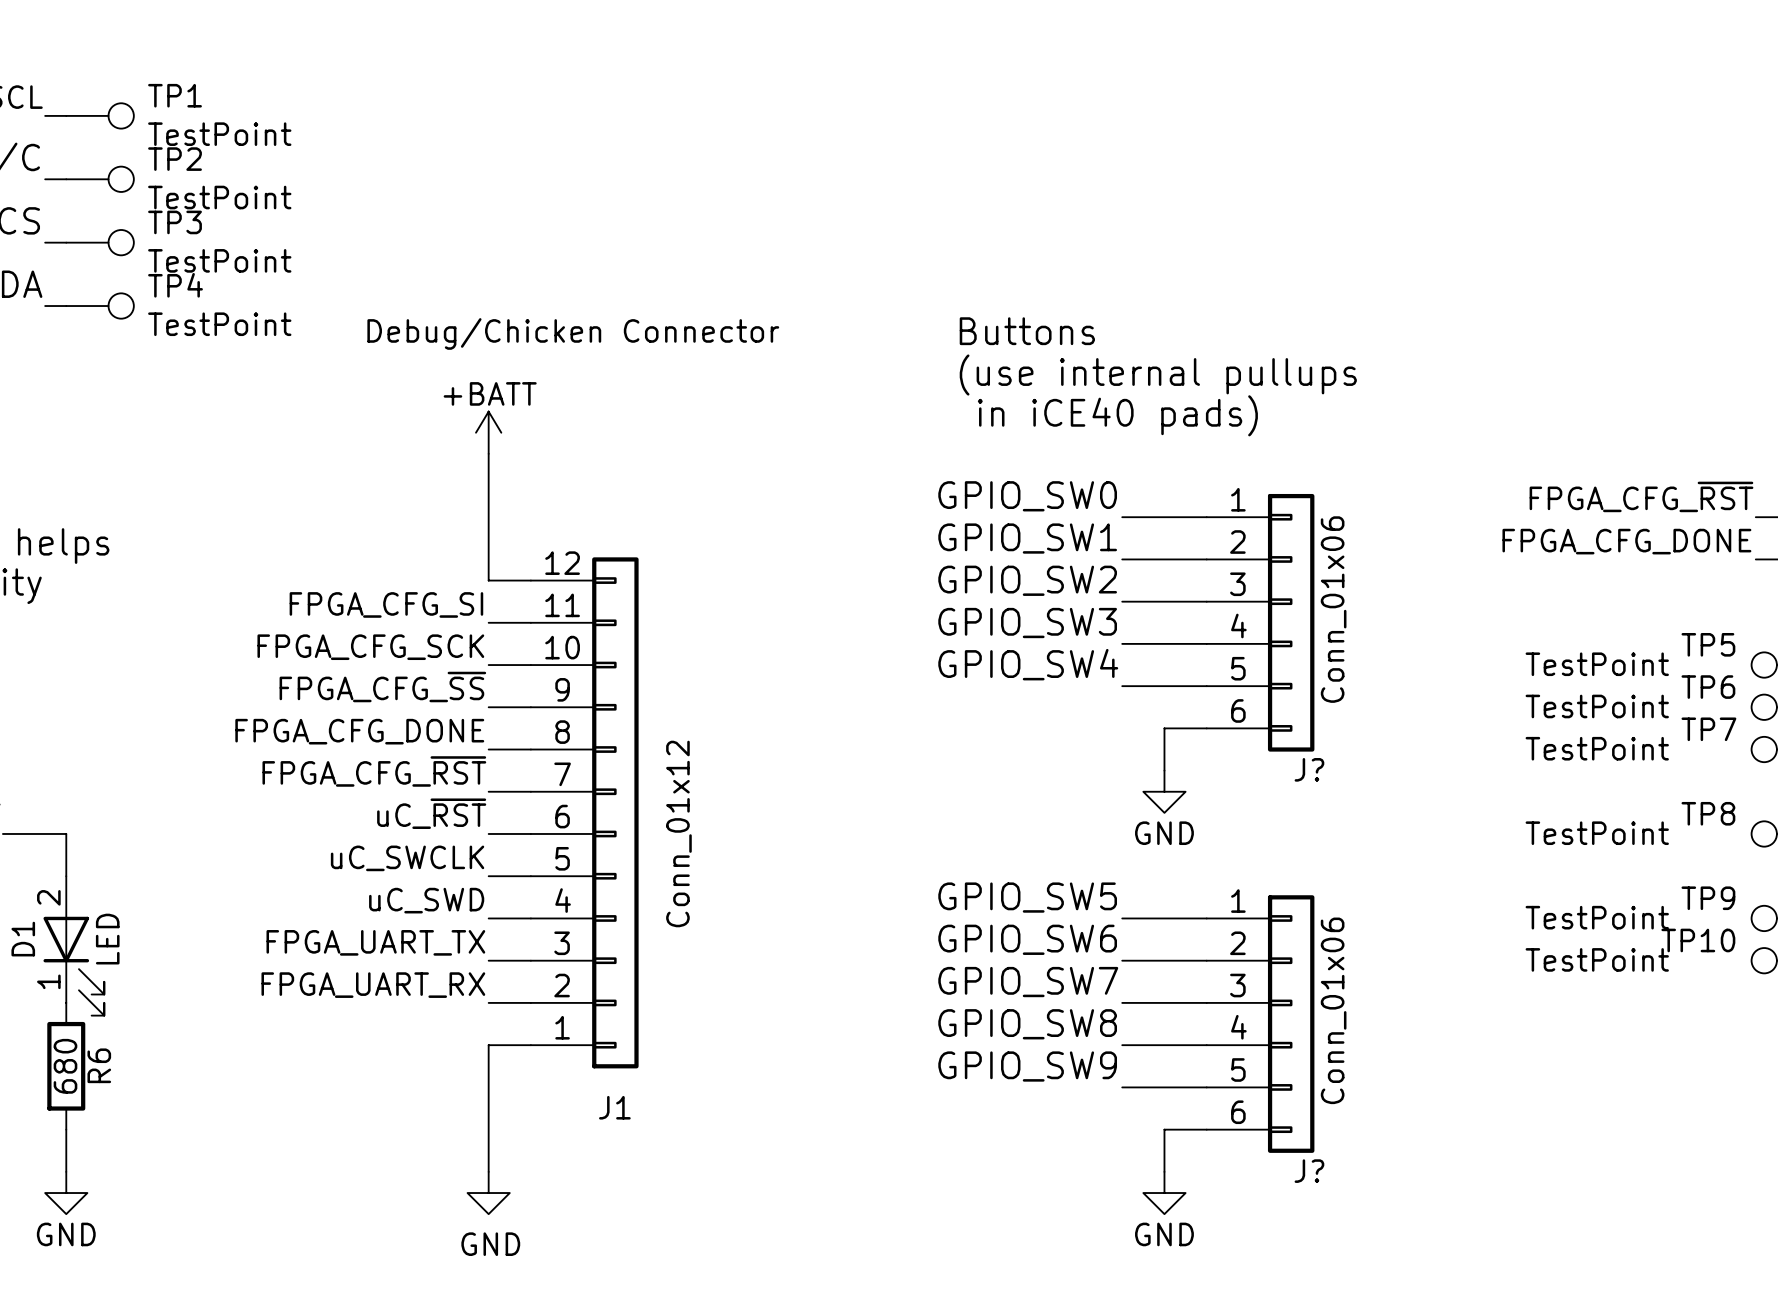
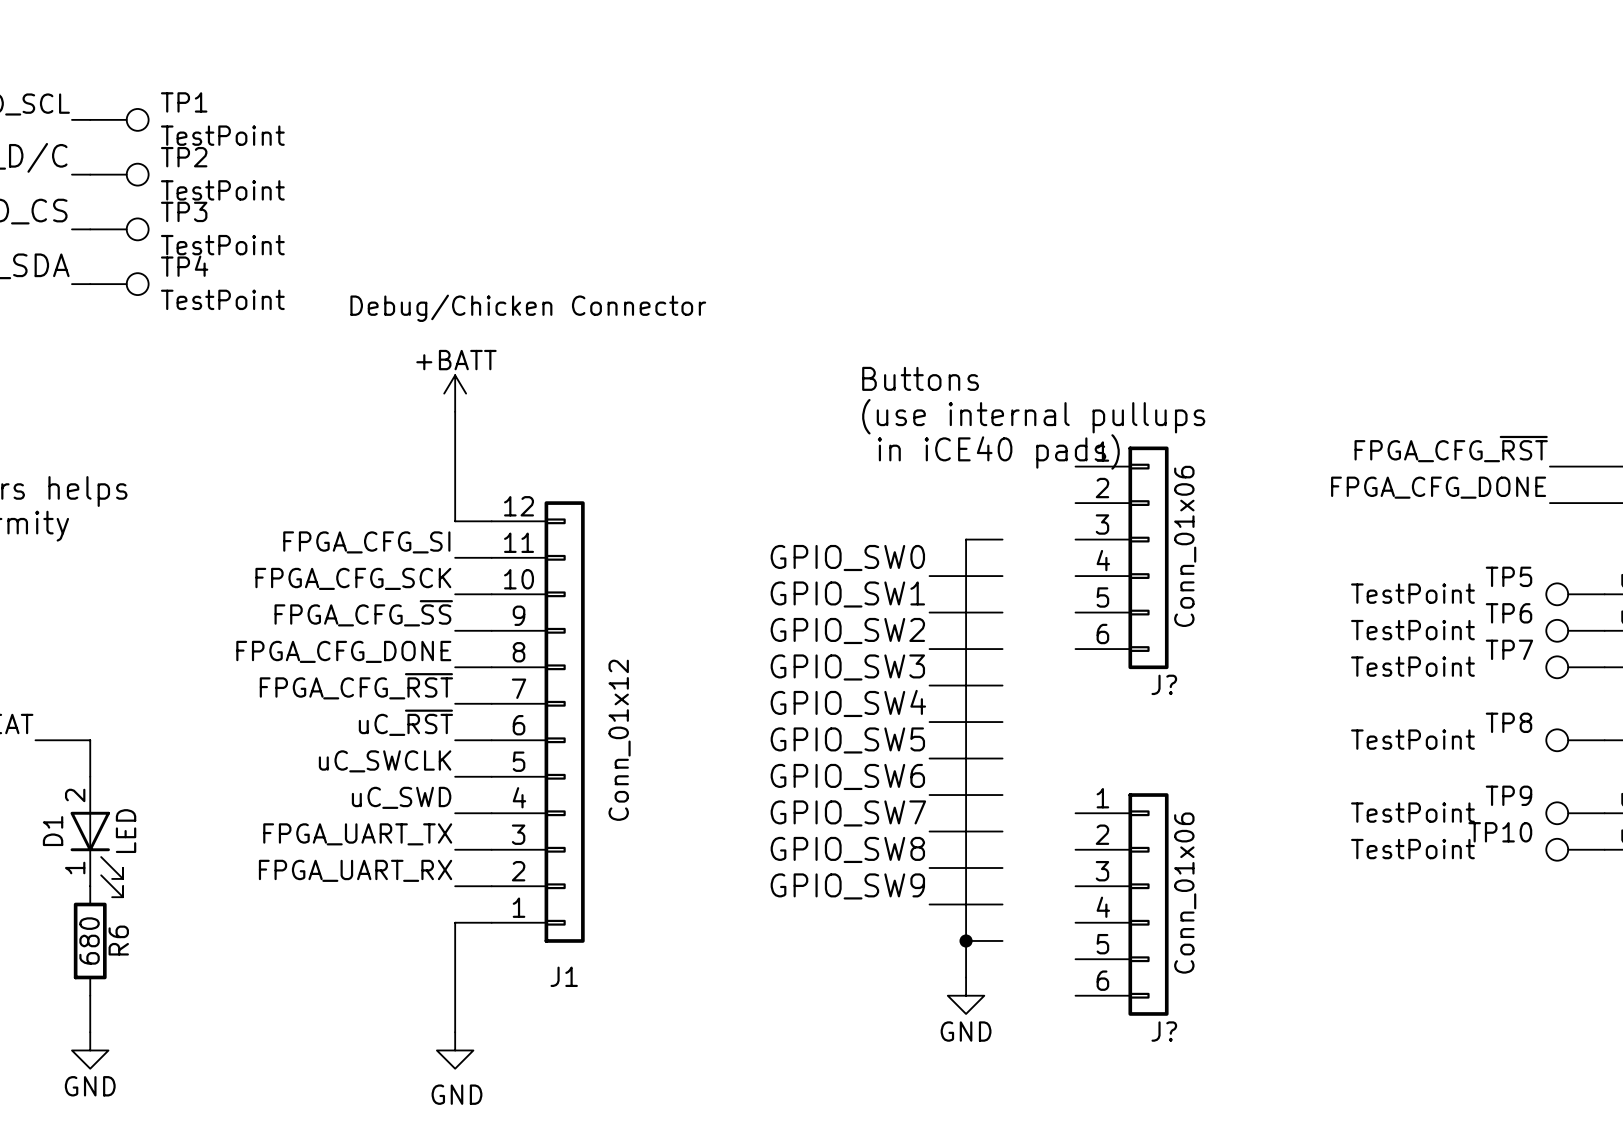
text position: Buttons (1027, 331) -> Buttons (920, 378)
text position: (use internal pullups (1158, 375) -> (use internal pullups (1033, 416)
text position: in iCE40 pads) (1117, 415) -> in iCE40 pads) (998, 451)
label position: GPIO_SW0 (1027, 496) -> GPIO_SW0 (847, 558)
wire: (1122, 517) (1206, 517) -> (929, 685) (1002, 685)
label position: GPIO_SW1 (1027, 538) -> GPIO_SW1 (847, 594)
wire: (1122, 559) (1206, 559) -> (929, 649) (1002, 649)
label position: GPIO_SW2 (1027, 580) -> GPIO_SW2 (847, 630)
wire: (1122, 601) (1206, 601) -> (1002, 539) (966, 539) (966, 977)
label position: GPIO_SW3 (1027, 623) -> GPIO_SW3 (847, 667)
wire: (1122, 643) (1206, 643) -> (1002, 576) (929, 576)
label position: GPIO_SW4 (1028, 664) -> GPIO_SW4 (848, 703)
wire: (1122, 686) (1206, 686) -> (1002, 612) (929, 612)
wire: (1206, 728) (1164, 728) (1164, 770) -> none
power symbol: GND (1164, 791) -> none
wire: none -> (929, 722) (1002, 722)
label position: GPIO_SW5 (1027, 897) -> GPIO_SW5 (847, 740)
wire: (1122, 918) (1206, 918) -> (929, 758) (1002, 758)
label position: GPIO_SW6 (1027, 939) -> GPIO_SW6 (847, 776)
wire: (1122, 960) (1206, 960) -> (929, 795) (1002, 795)
label position: GPIO_SW7 (1028, 982) -> GPIO_SW7 (848, 813)
wire: (1122, 1002) (1206, 1002) -> (929, 831) (1002, 831)
label position: GPIO_SW8 (1027, 1024) -> GPIO_SW8 (847, 849)
wire: (1122, 1045) (1206, 1045) -> (929, 868) (1002, 868)
label position: GPIO_SW9 (1027, 1066) -> GPIO_SW9 (847, 886)
wire: none -> (966, 940) (1002, 940)
junction: none -> (966, 940)
wire: (1122, 1087) (1206, 1087) -> (929, 904) (1002, 904)
wire: (1206, 1129) (1164, 1129) (1164, 1171) -> none
power symbol position: GND (1164, 1193) -> GND (966, 995)

